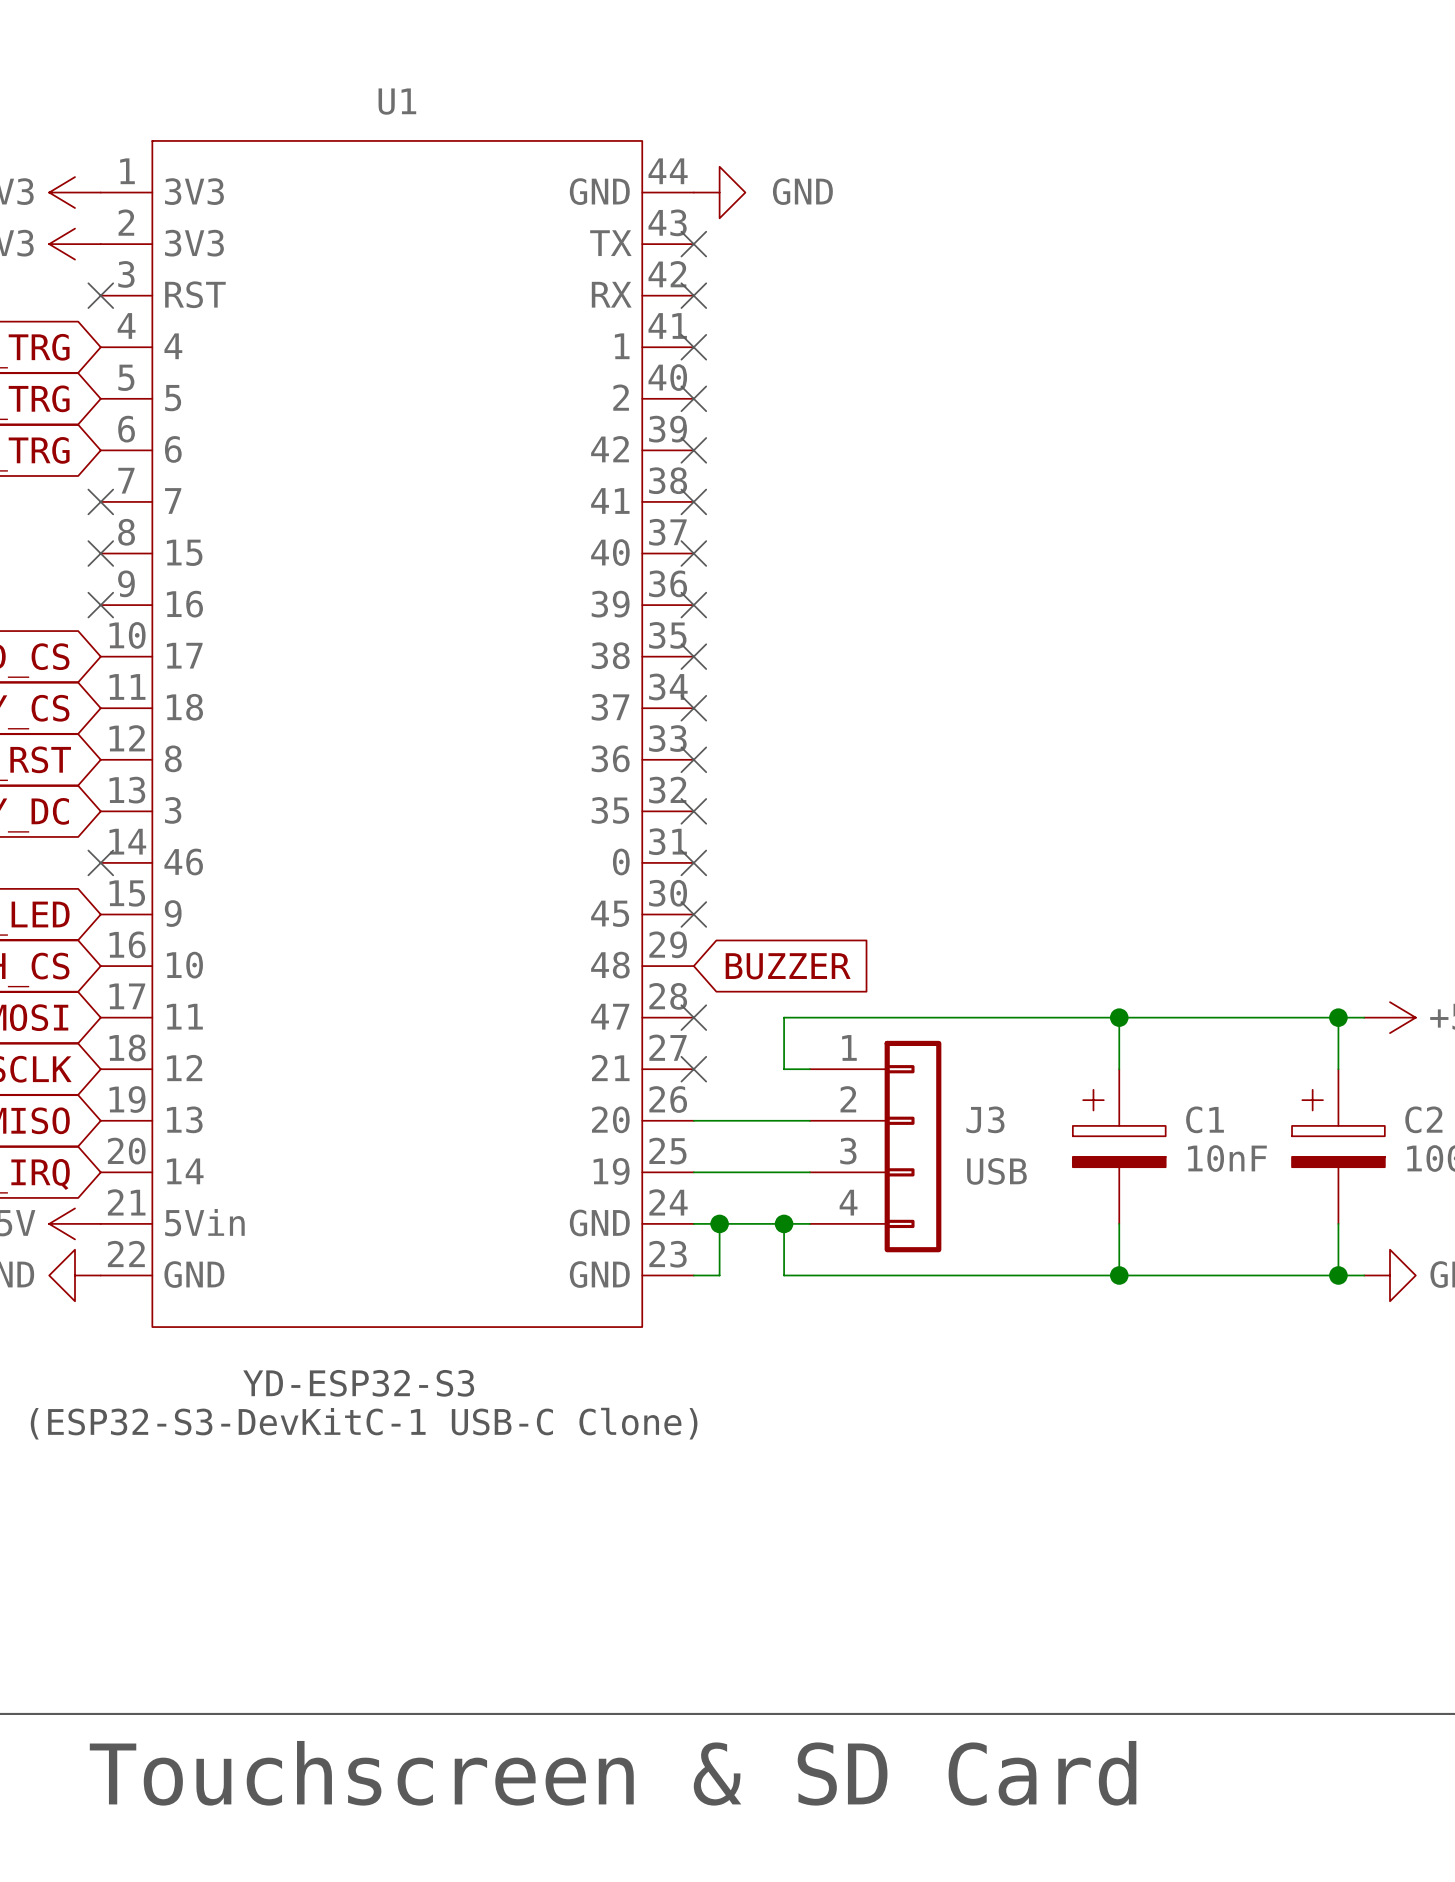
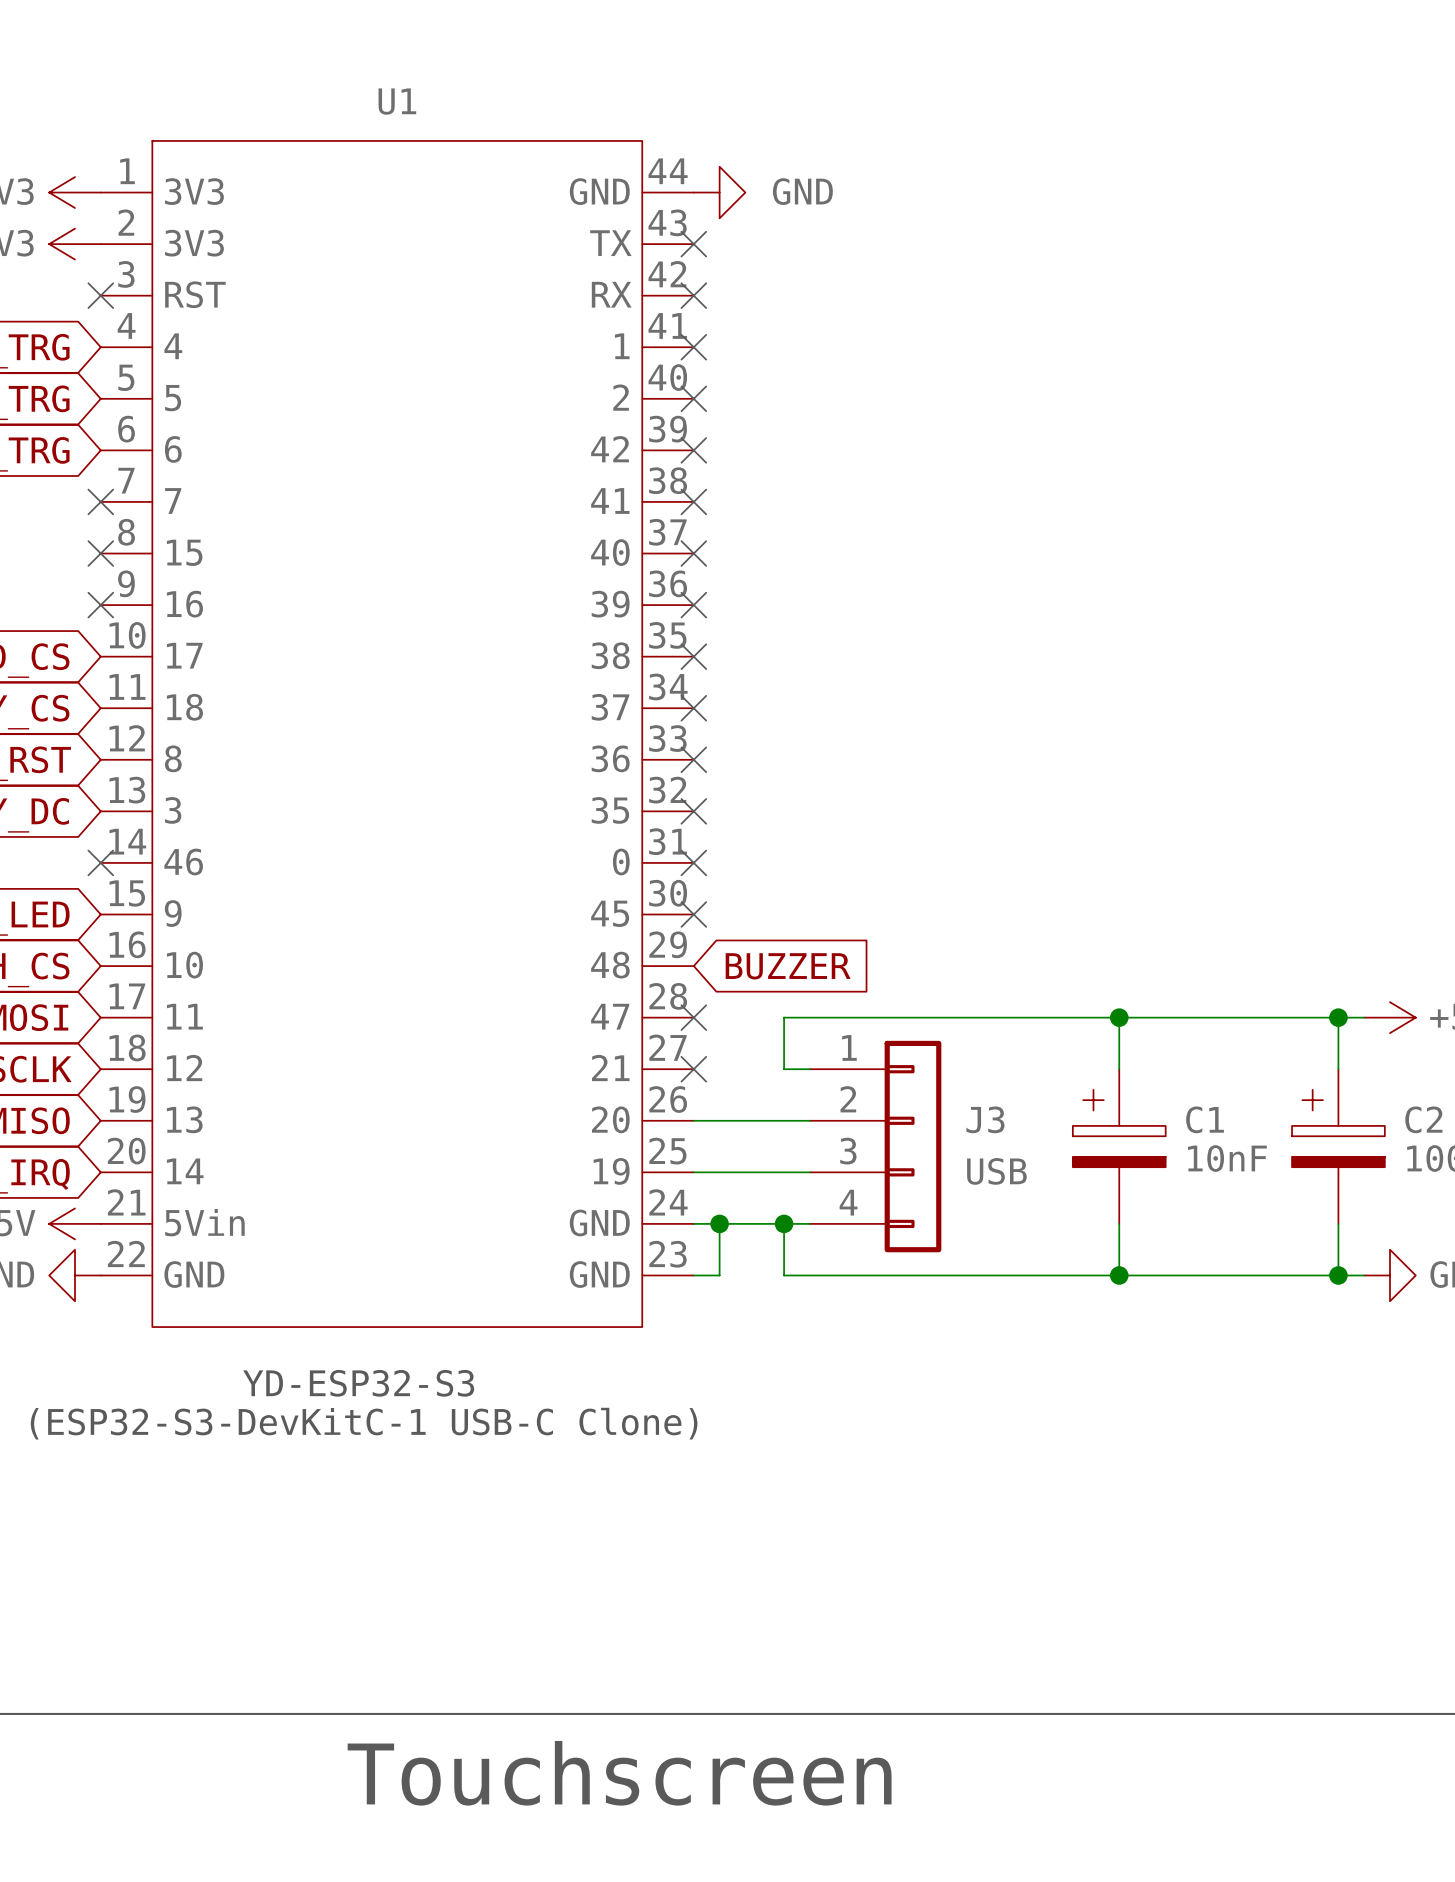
text: Touchscreen & SD Card (613, 1773) -> Touchscreen (619, 1773)

